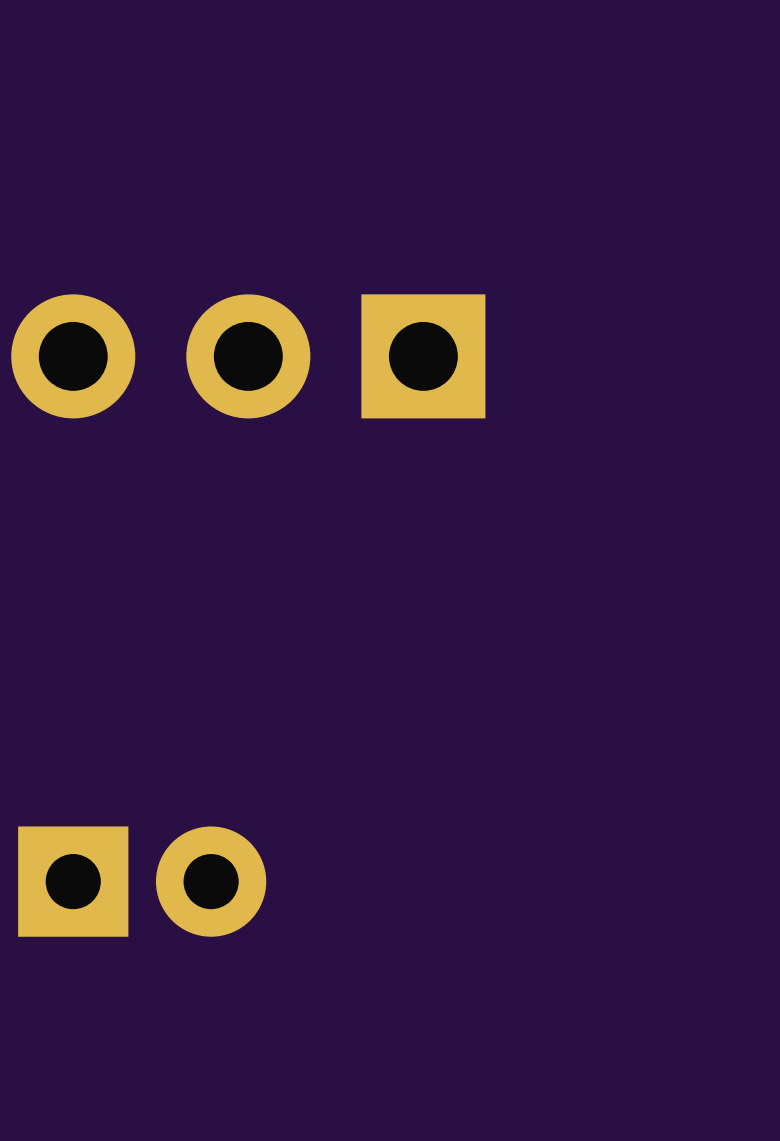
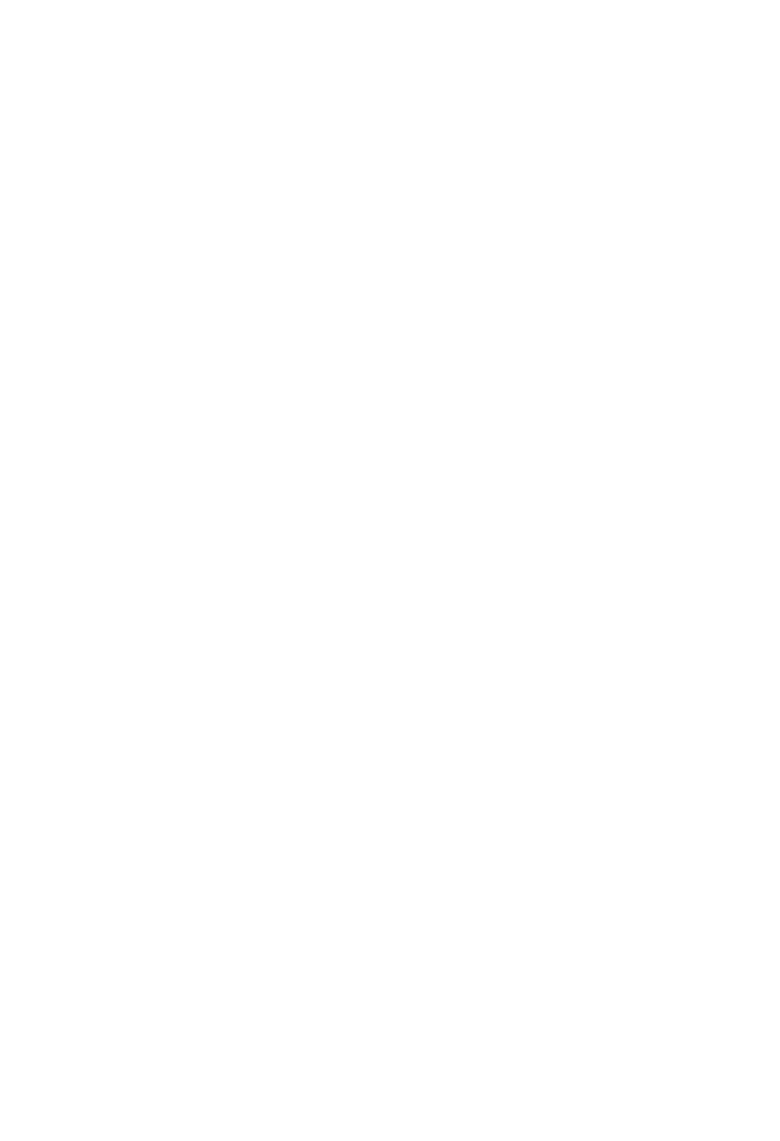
part: (248, 356) -> none
part: (142, 881) -> none

